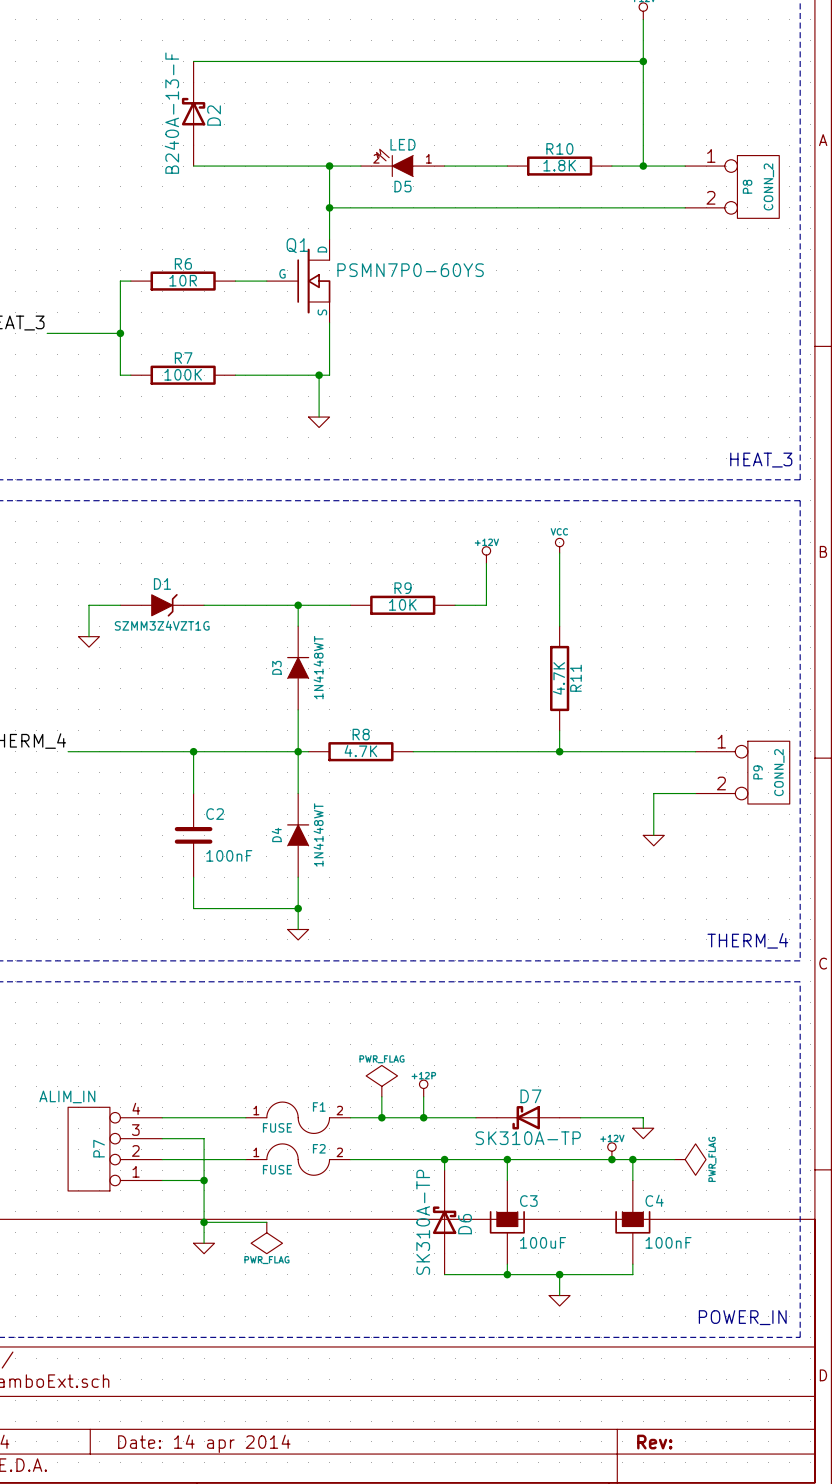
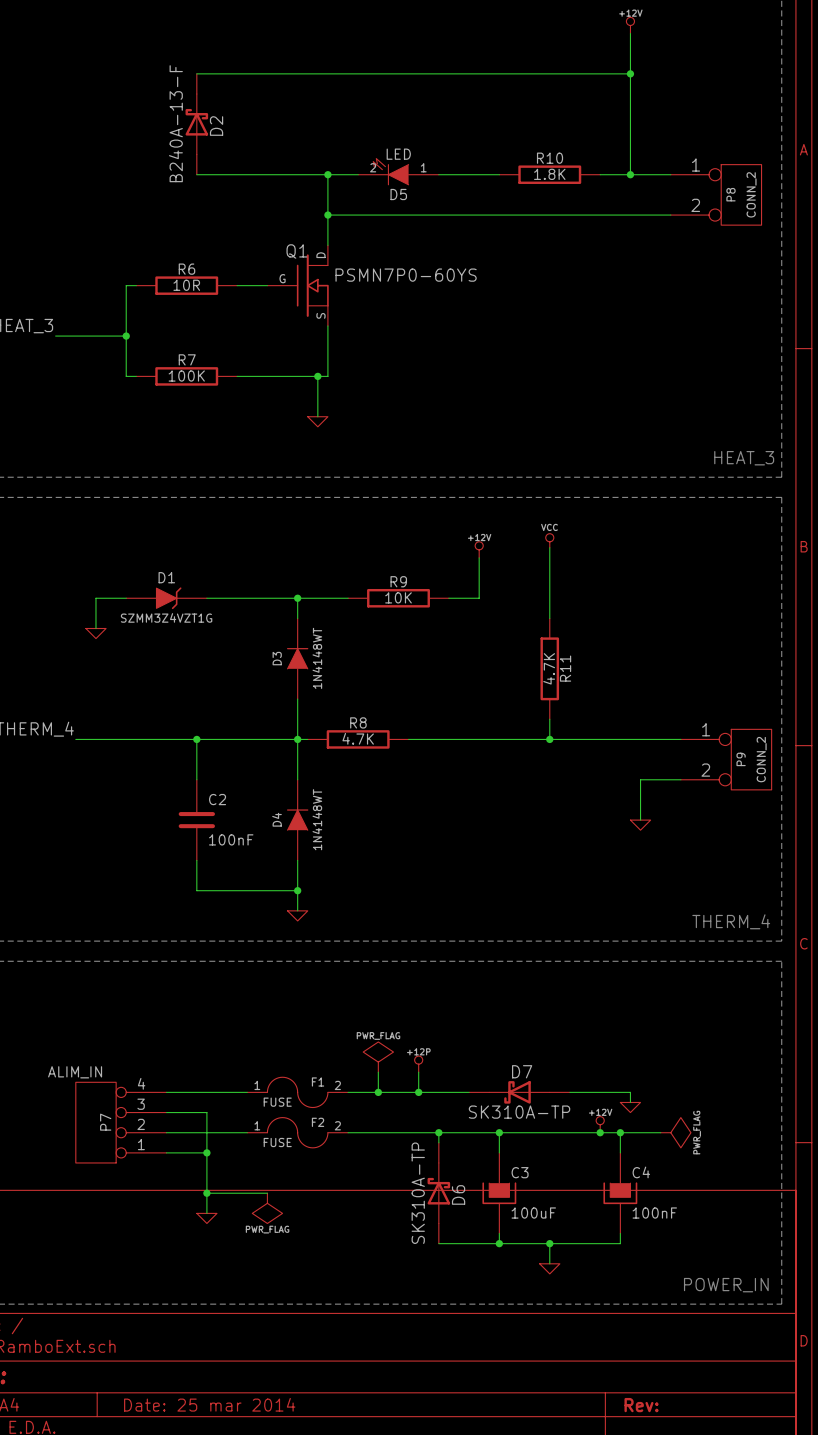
title block: Date: 14 apr 2014 (204, 1443) -> Date: 25 mar 2014 (209, 1404)

